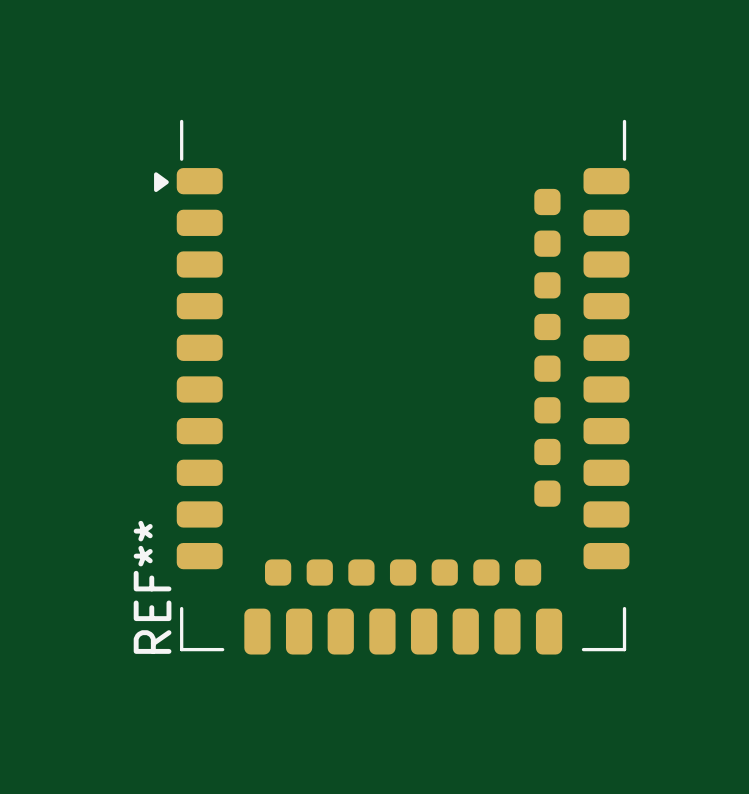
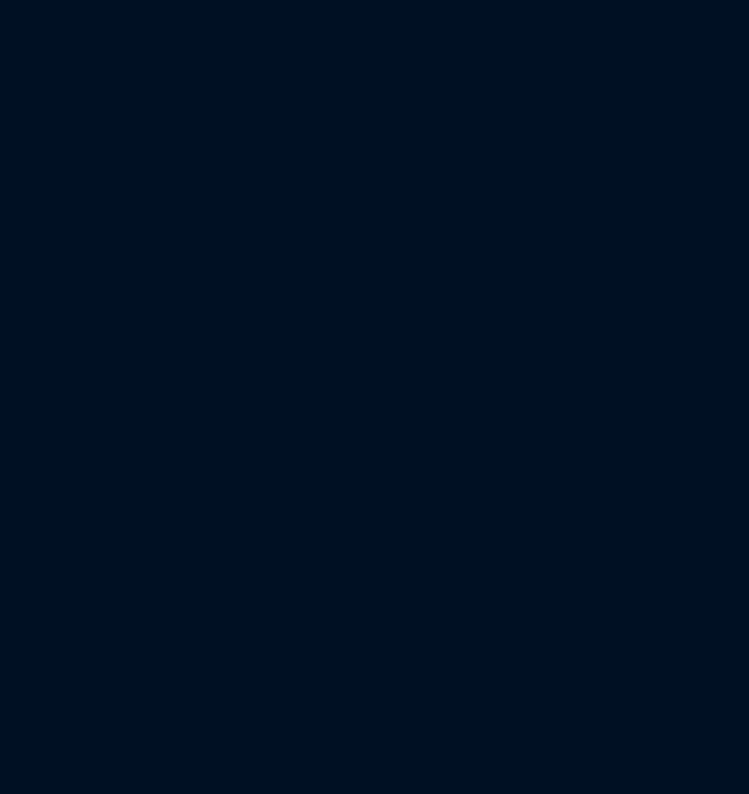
REF**: (391, 387) -> none

